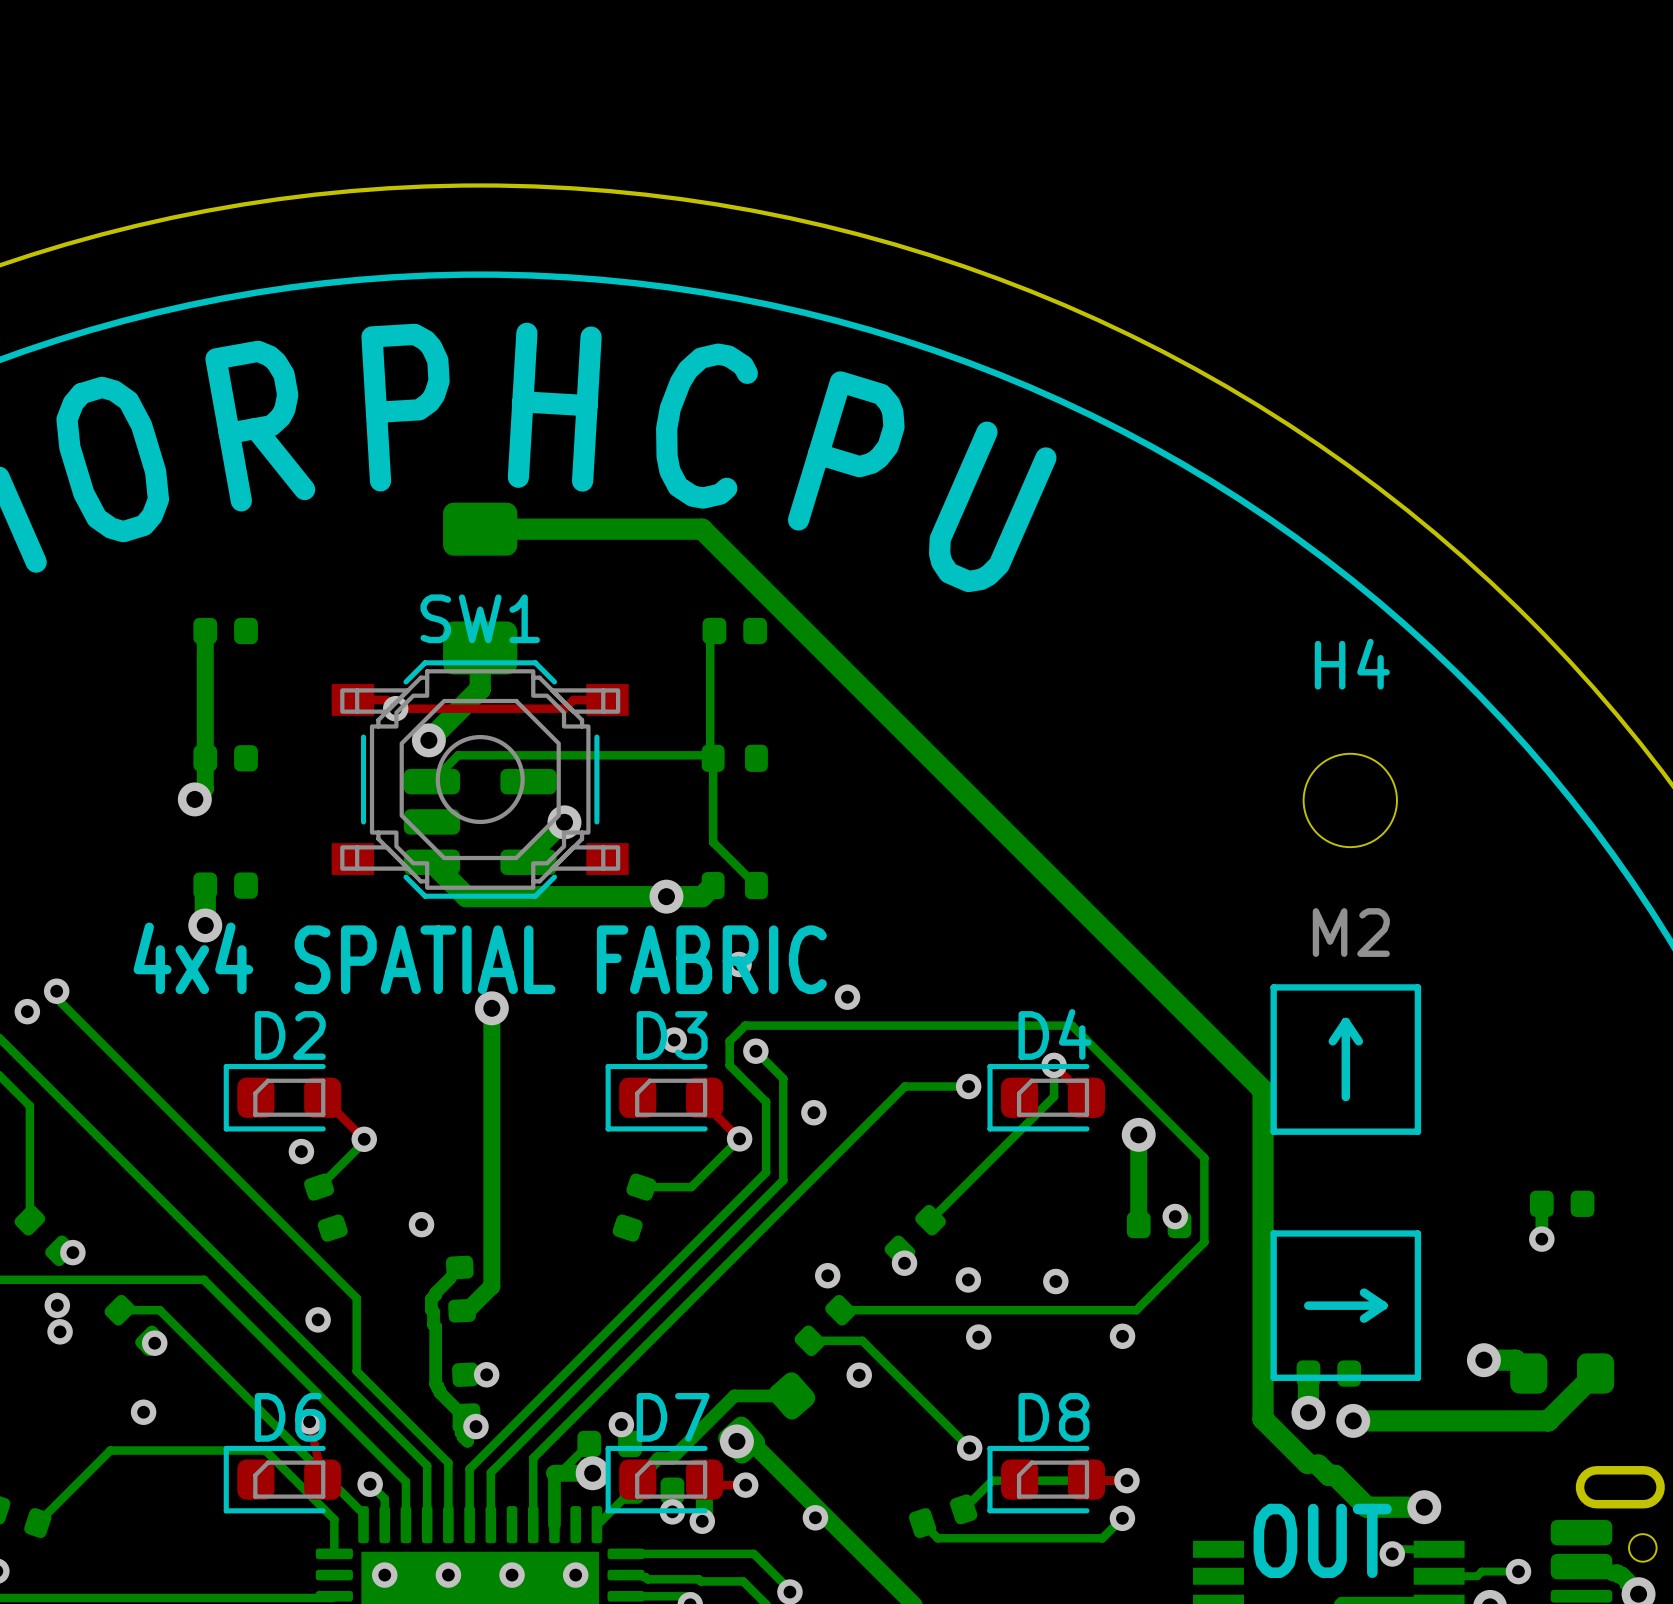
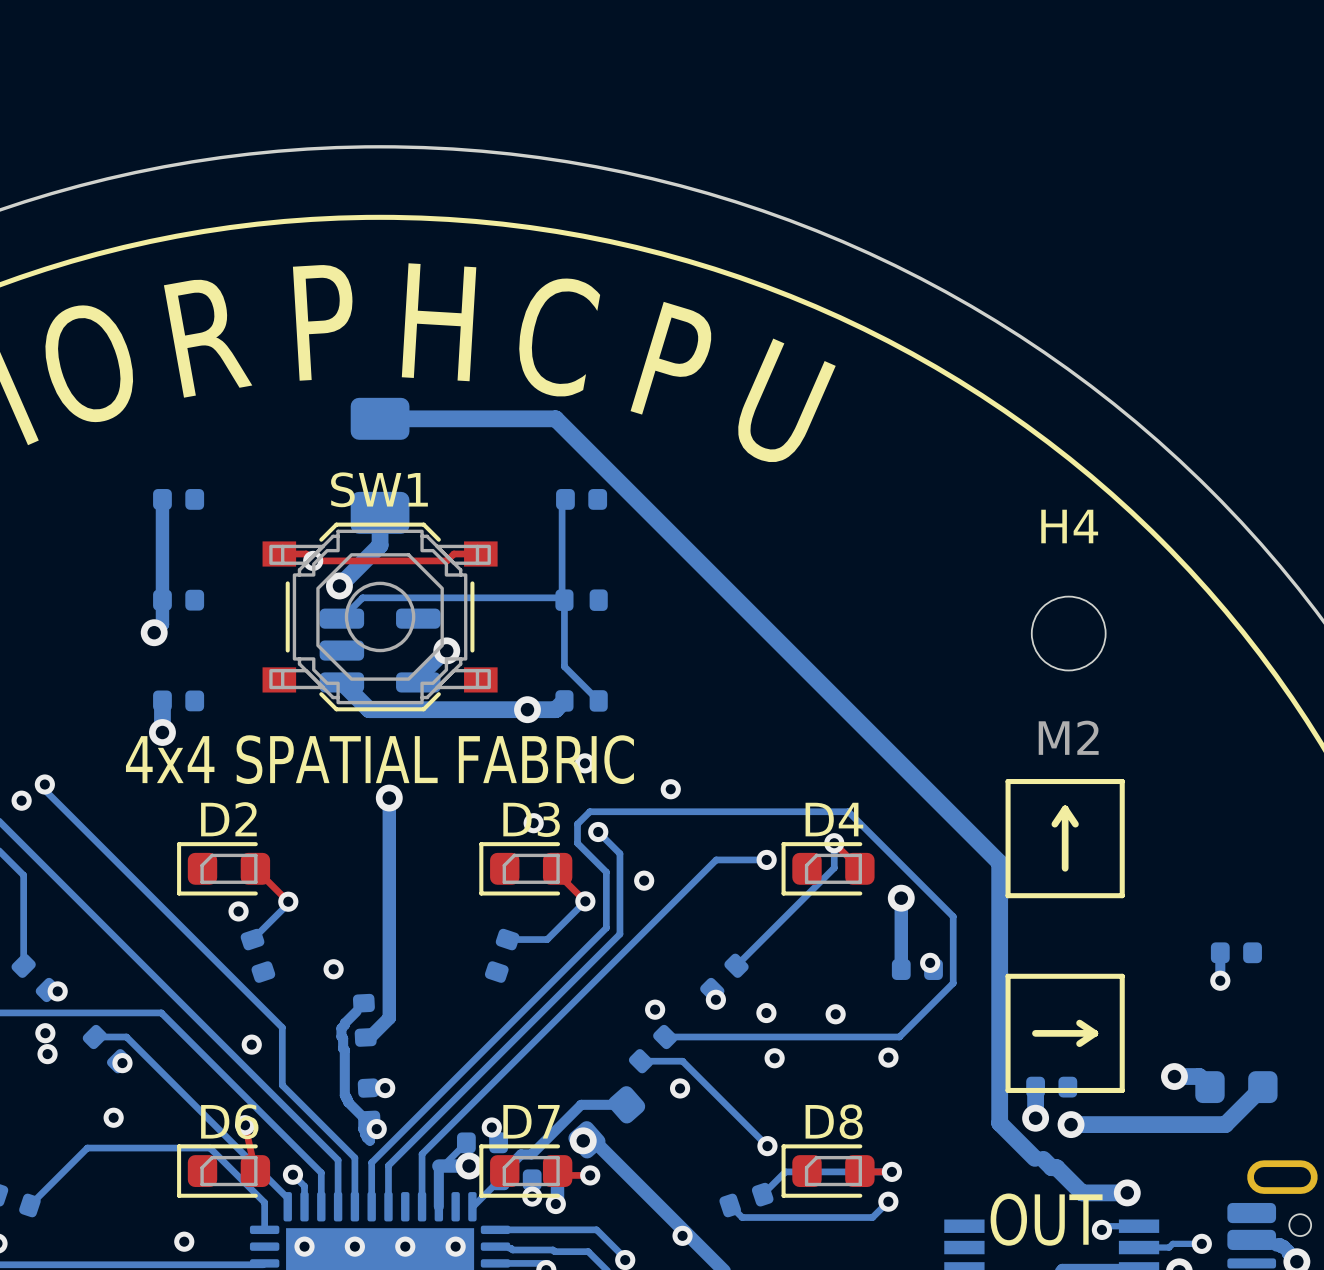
via position: (815, 1517) -> (682, 1235)
via: none -> (184, 1241)

